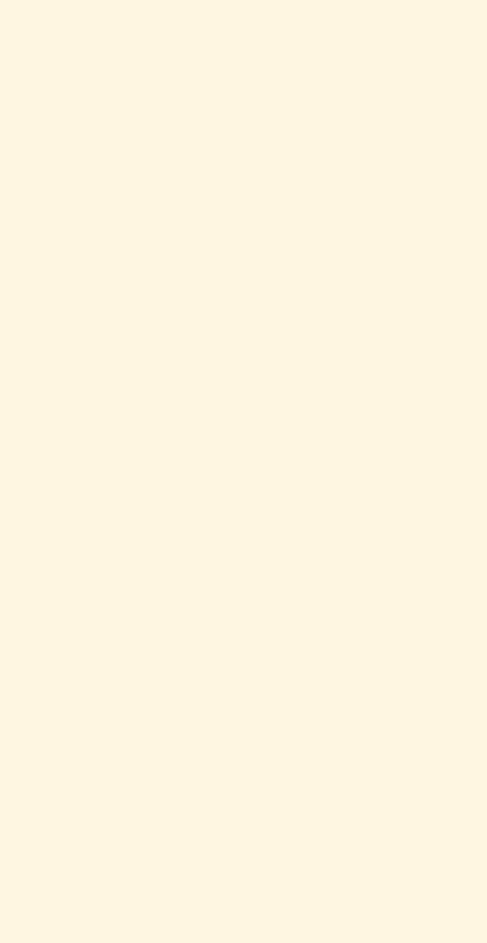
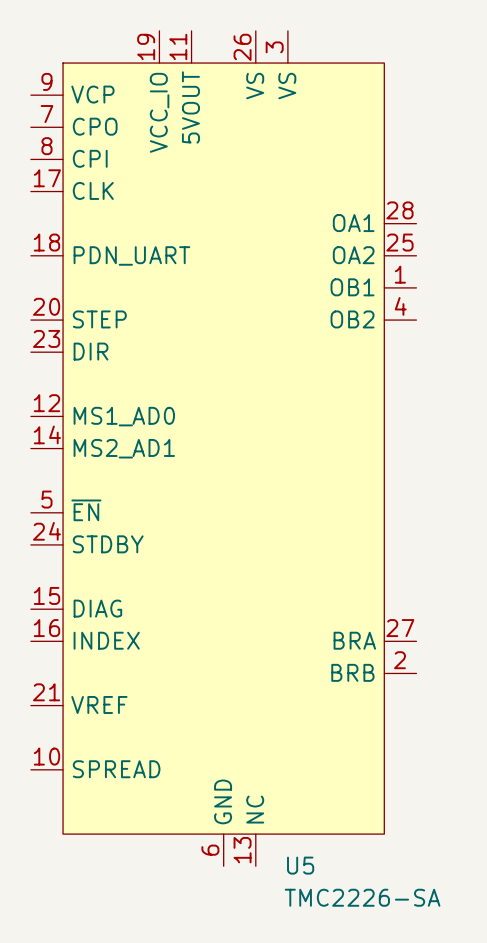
U5: none -> TMC2226-SA (223, 448)

